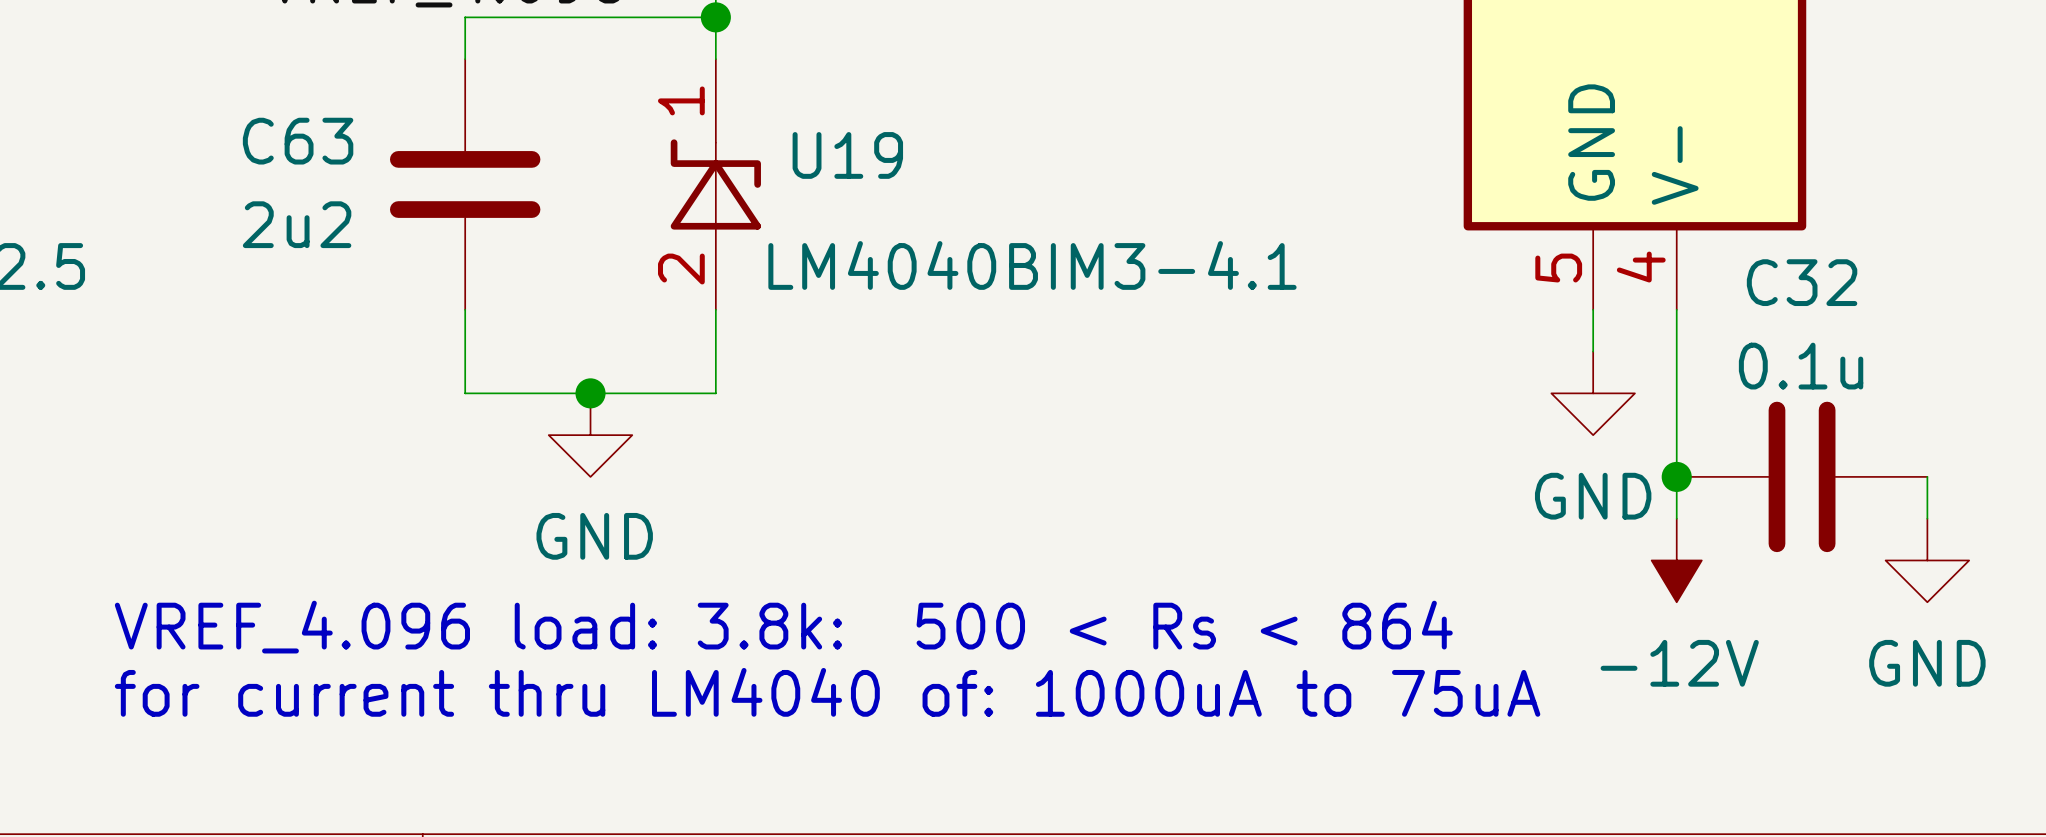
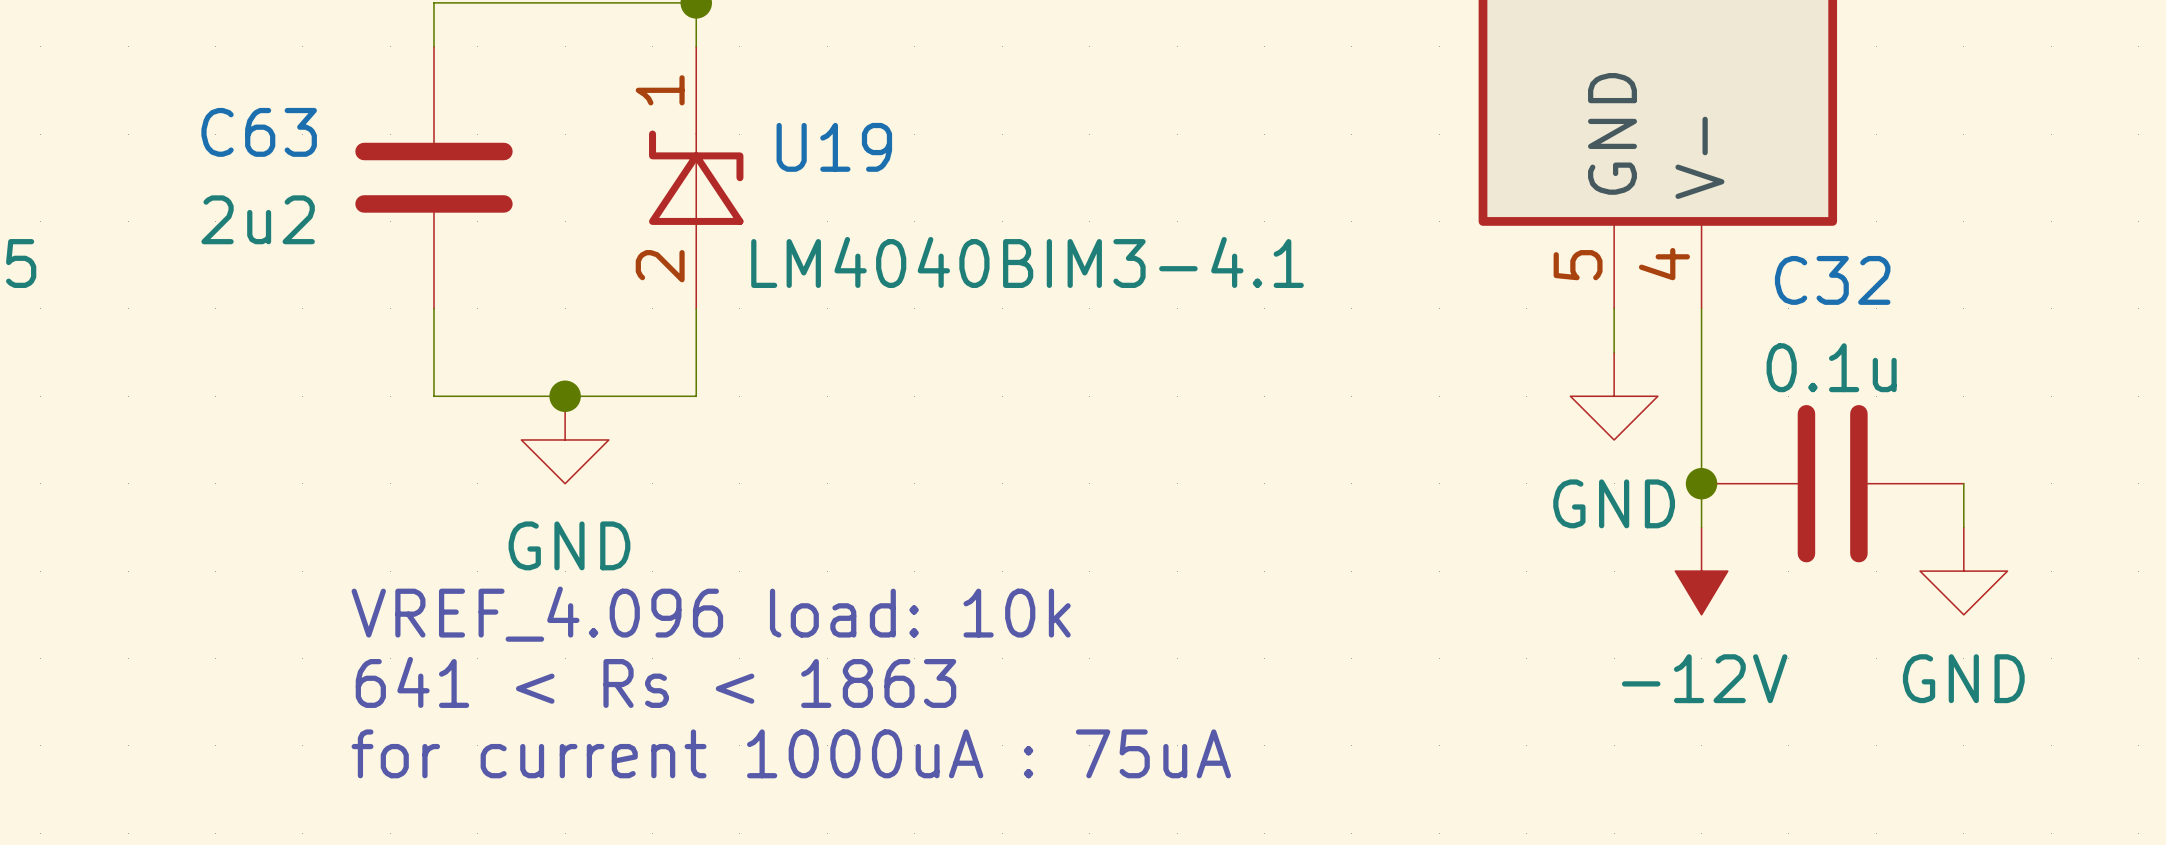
text: VREF_4.096 load: 3.8k: 500 < Rs < 864 (783, 627) -> VREF_4.096 load: 10k (711, 614)
text: none -> 641 < Rs < 1863 (655, 682)
text: for current thru LM4040 of: 1000uA to 75uA (827, 692) -> for current 1000uA : 75uA (791, 753)

